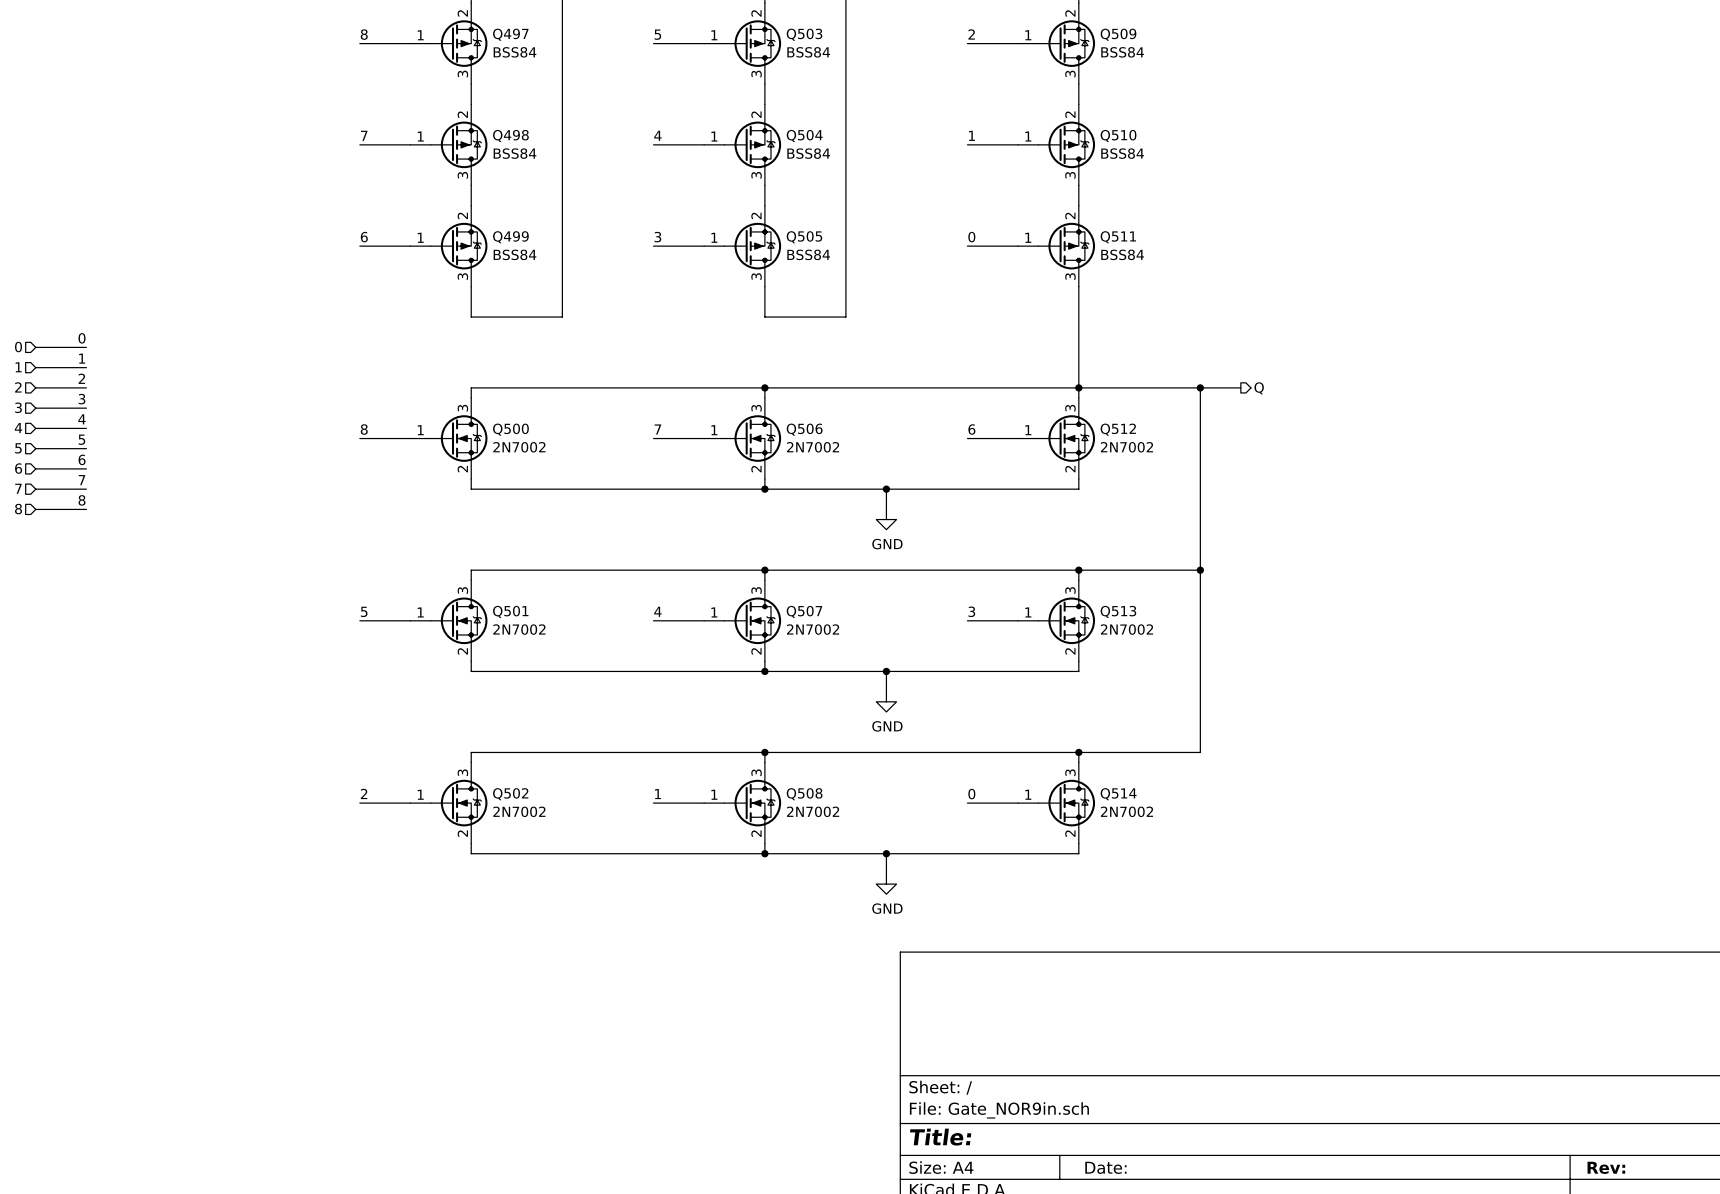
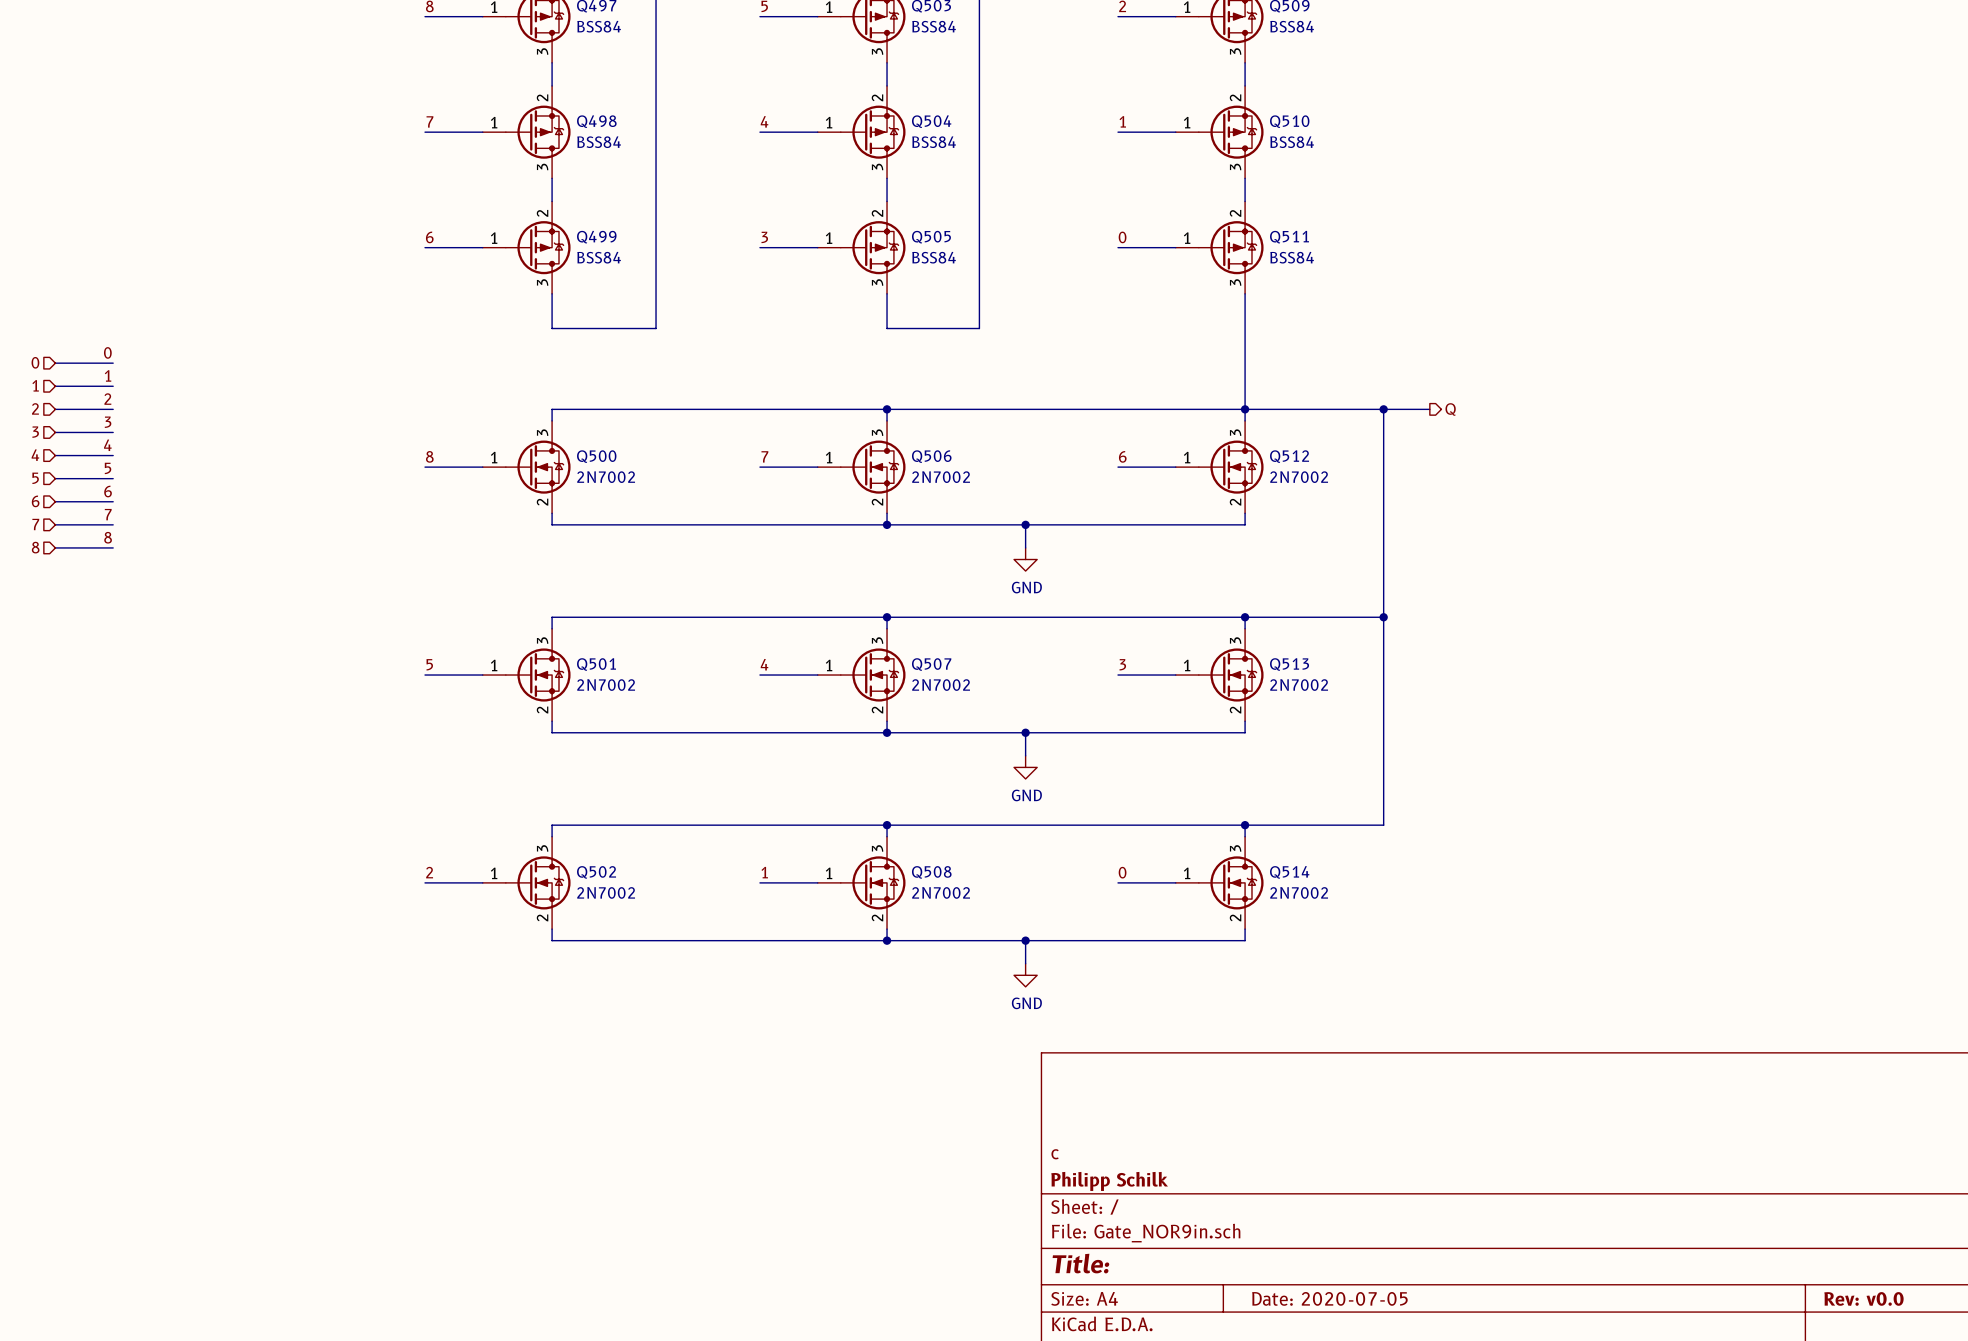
title block: none -> c (1055, 1154)
title block: none -> Philipp Schilk (1109, 1181)
title block: Date: (1105, 1167) -> Date: 2020-07-05 (1329, 1298)
title block: Rev: (1606, 1167) -> Rev: v0.0 (1863, 1298)

